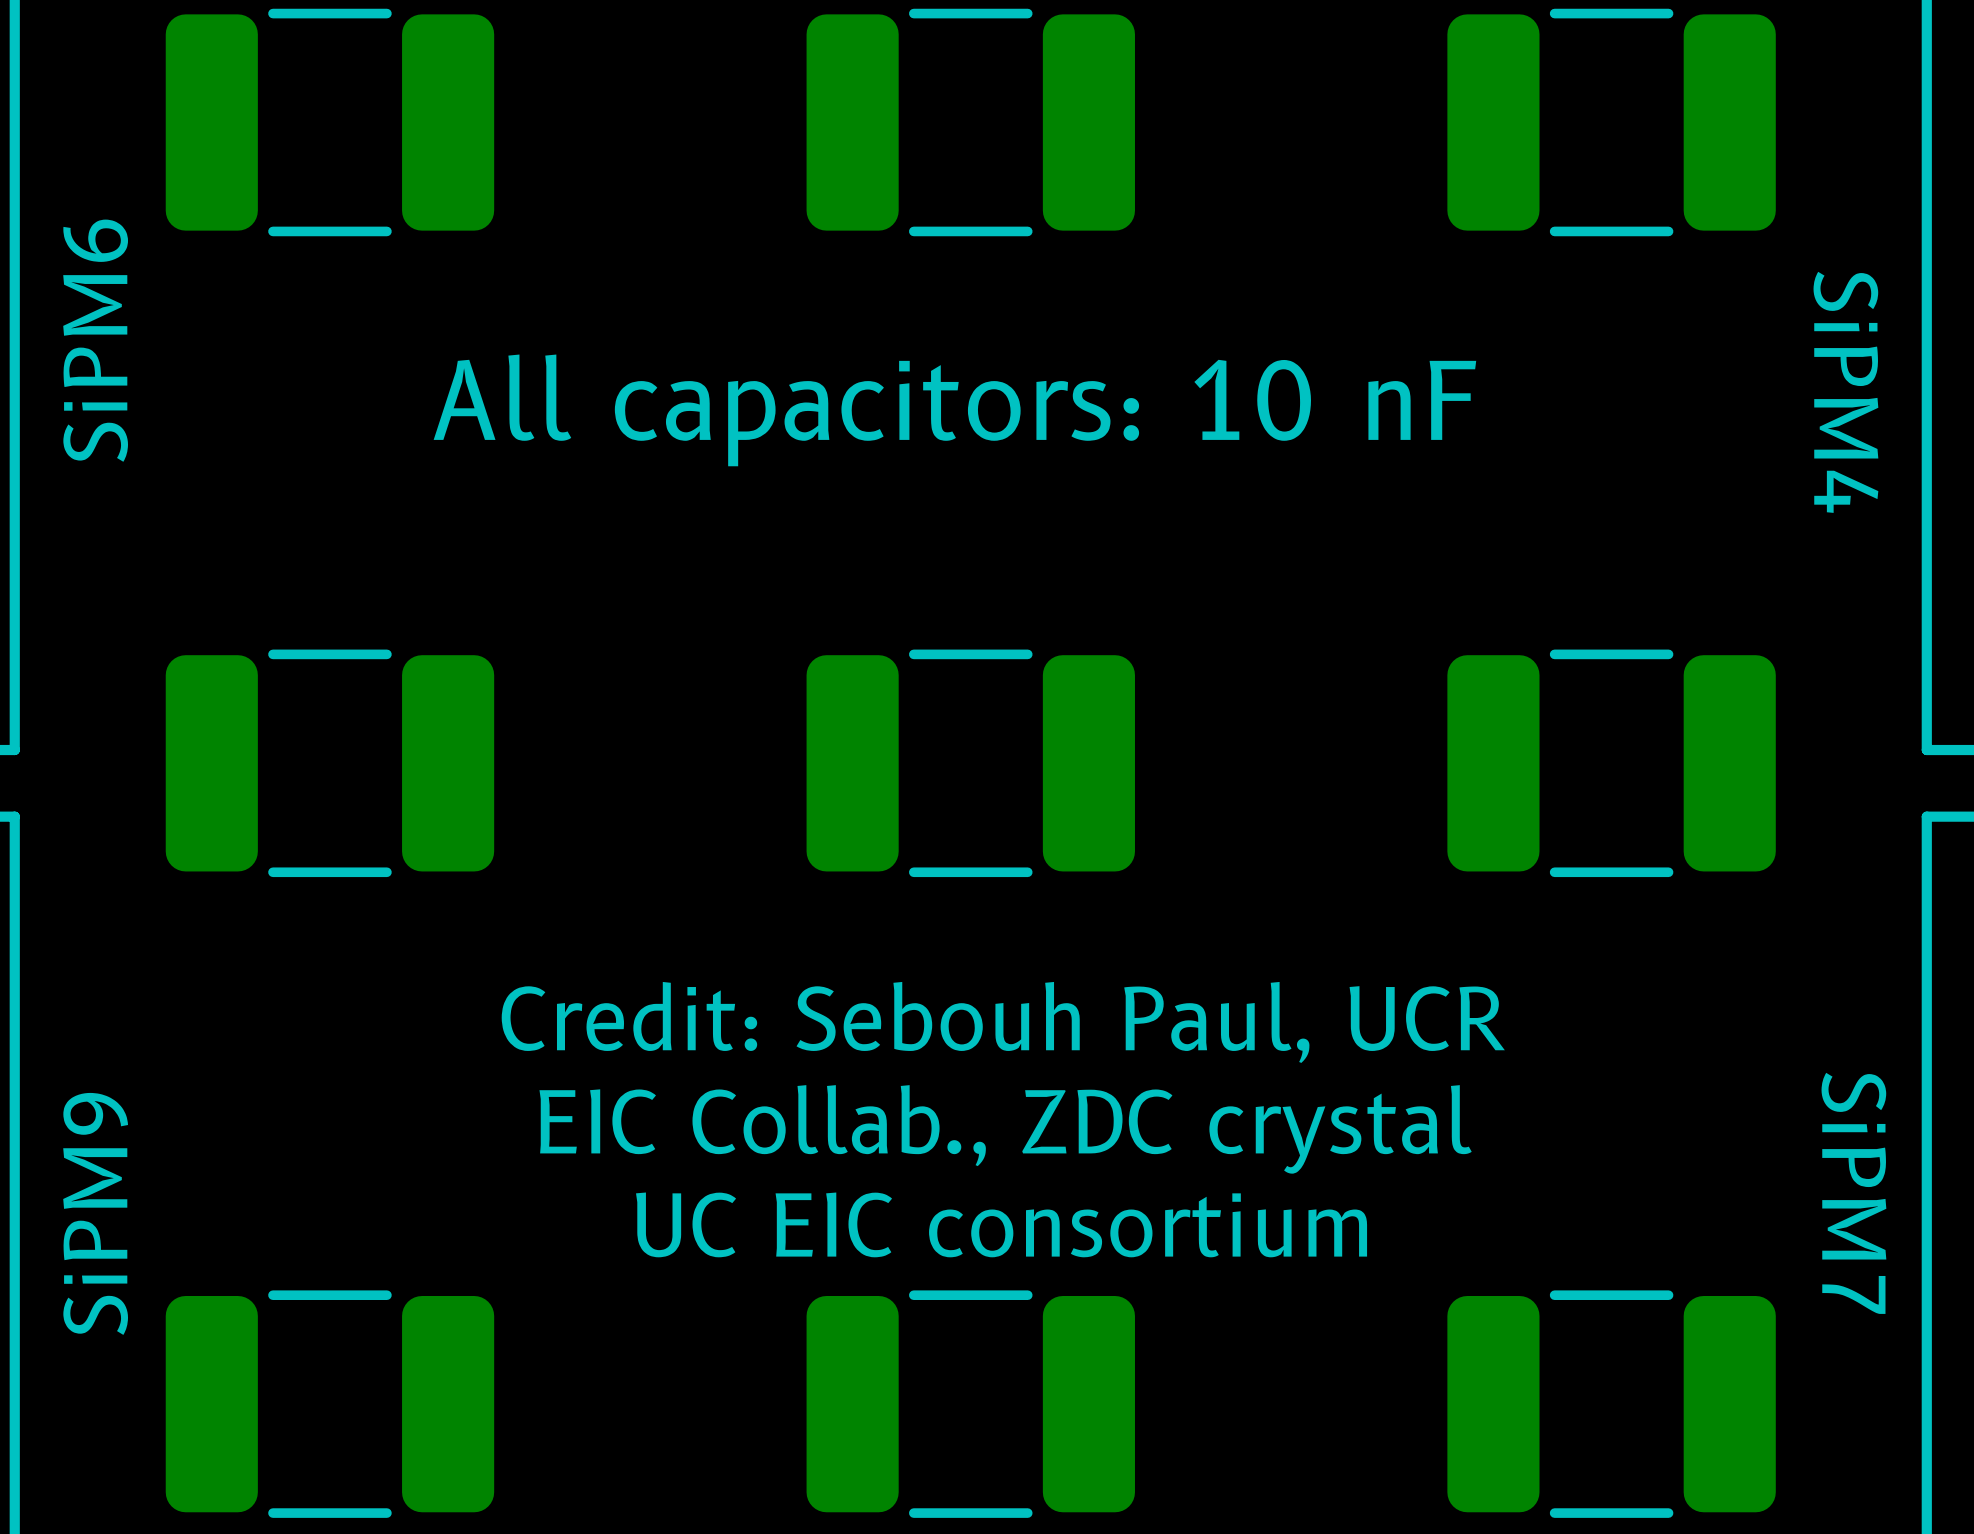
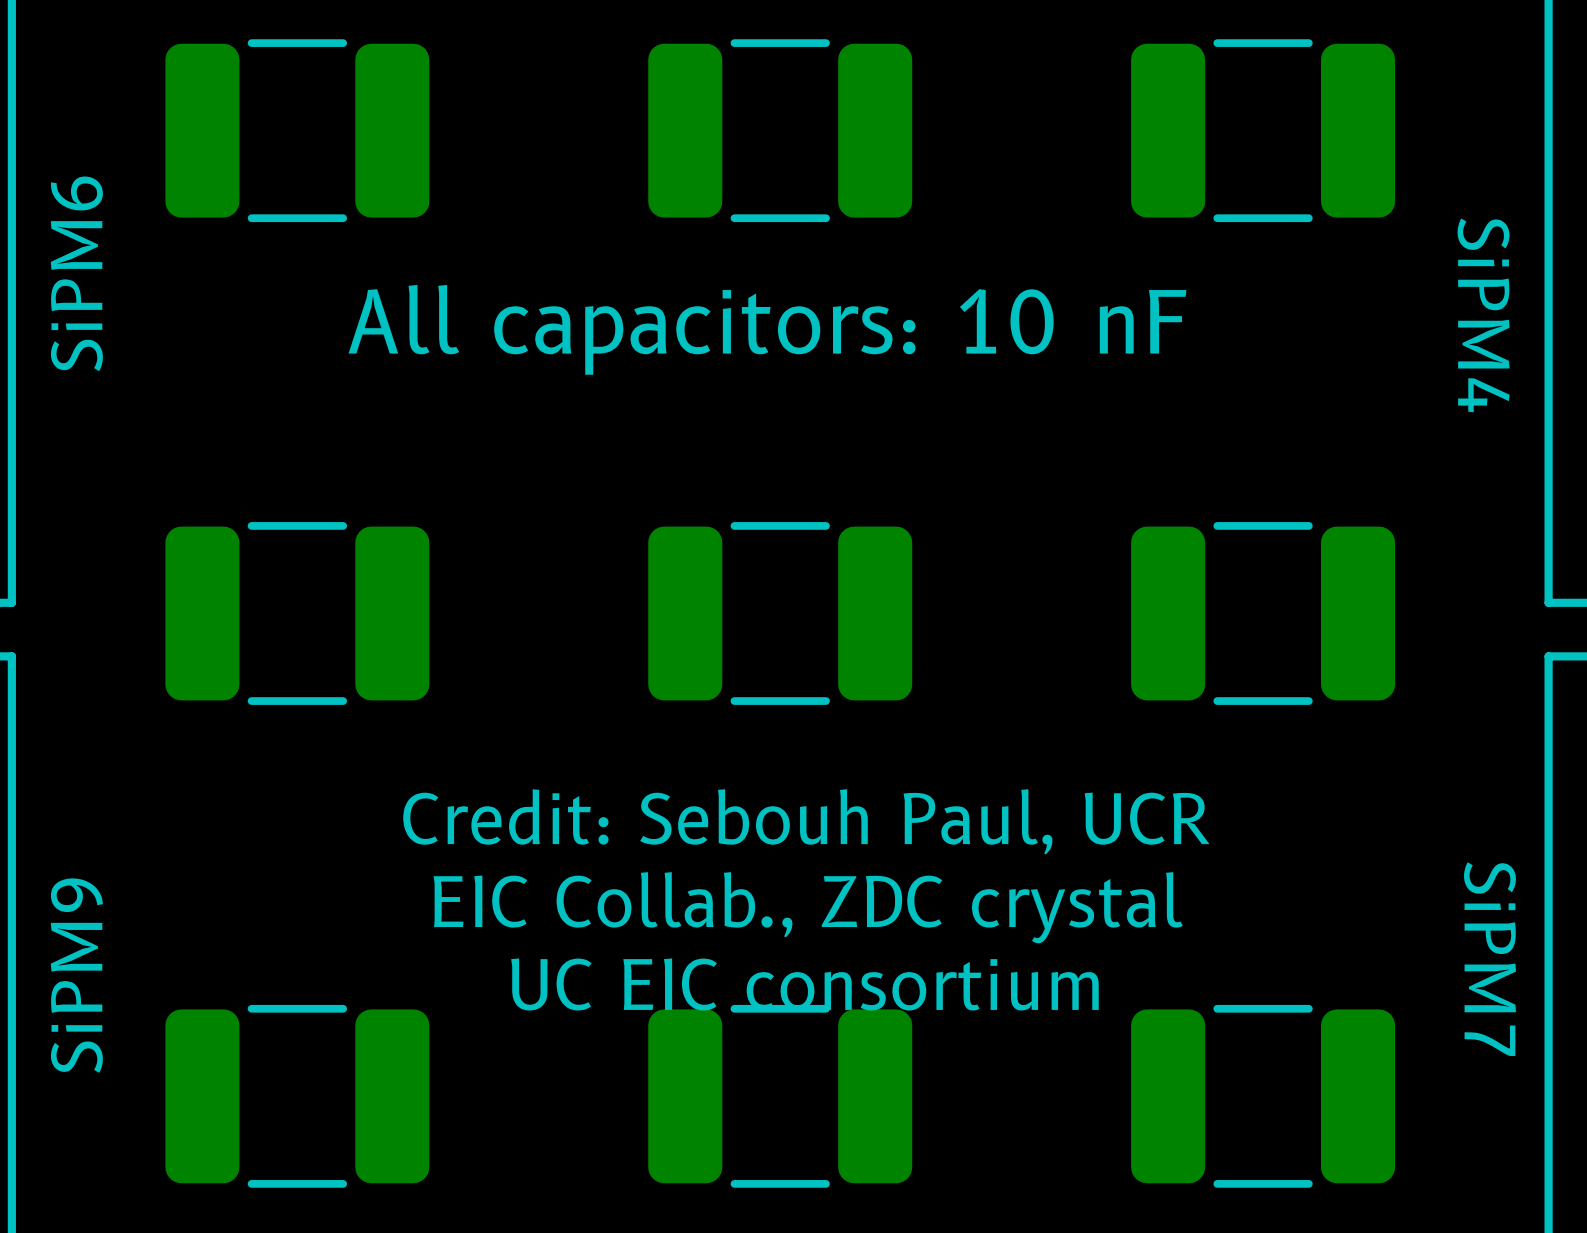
part position: (329, 122) -> (297, 130)
part position: (970, 122) -> (780, 130)
part position: (1611, 122) -> (1263, 130)
part position: (329, 763) -> (297, 613)
part position: (1611, 763) -> (1263, 613)
part position: (329, 1404) -> (297, 1096)
part position: (970, 1404) -> (780, 1096)
part position: (1611, 1404) -> (1263, 1096)

